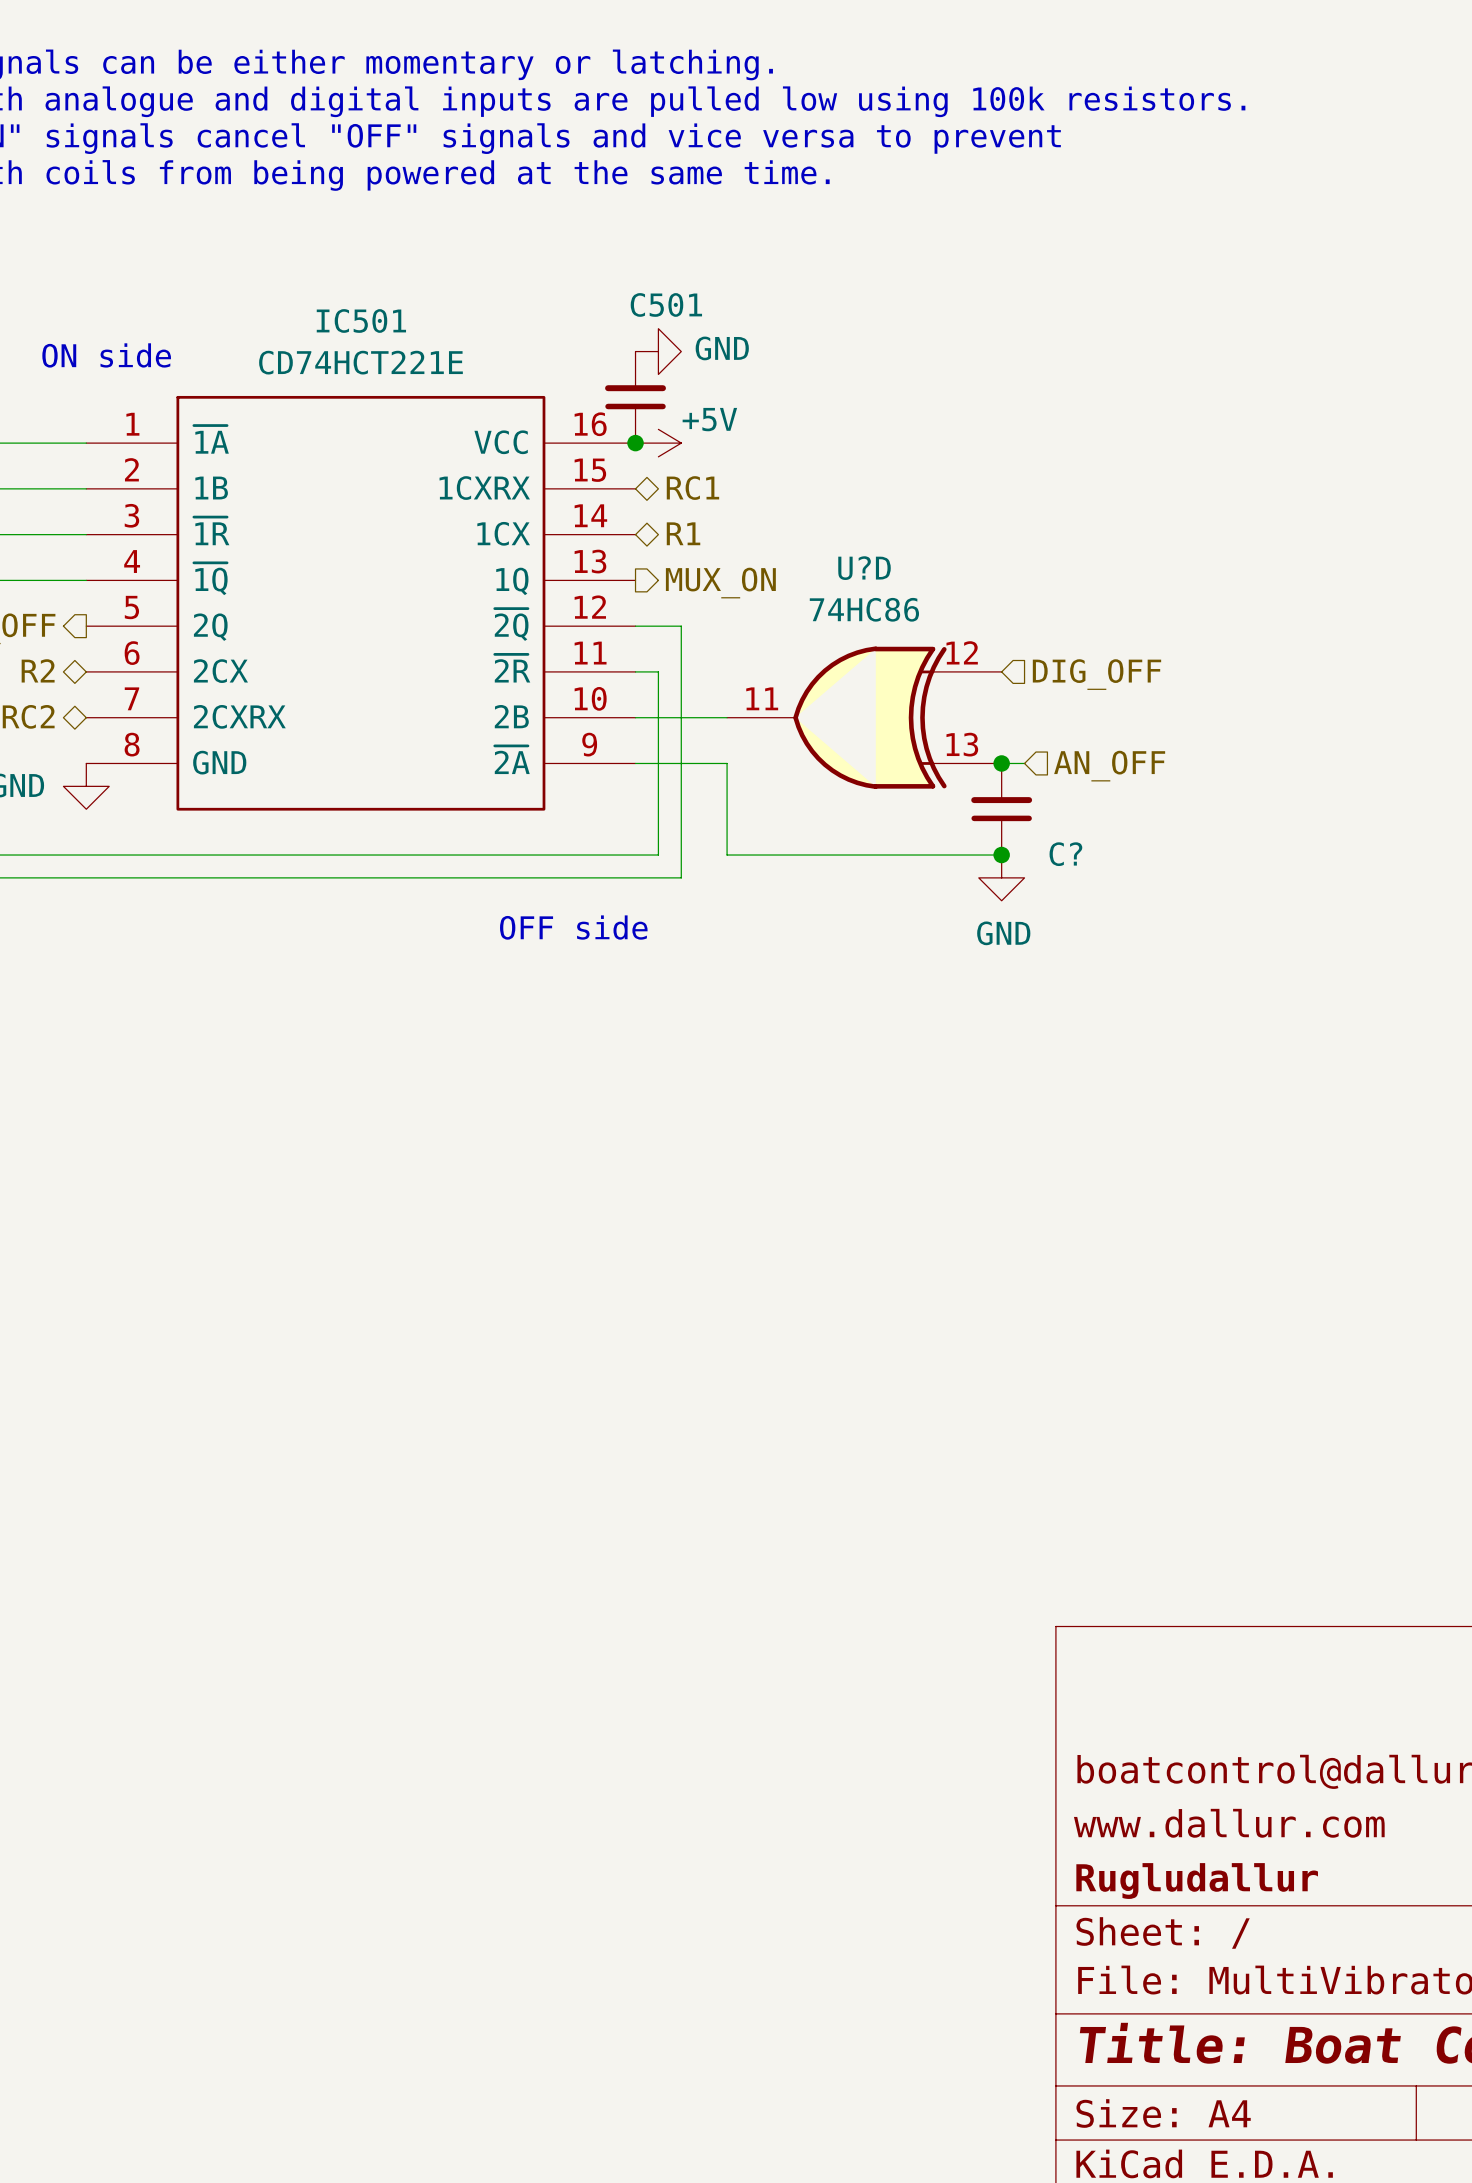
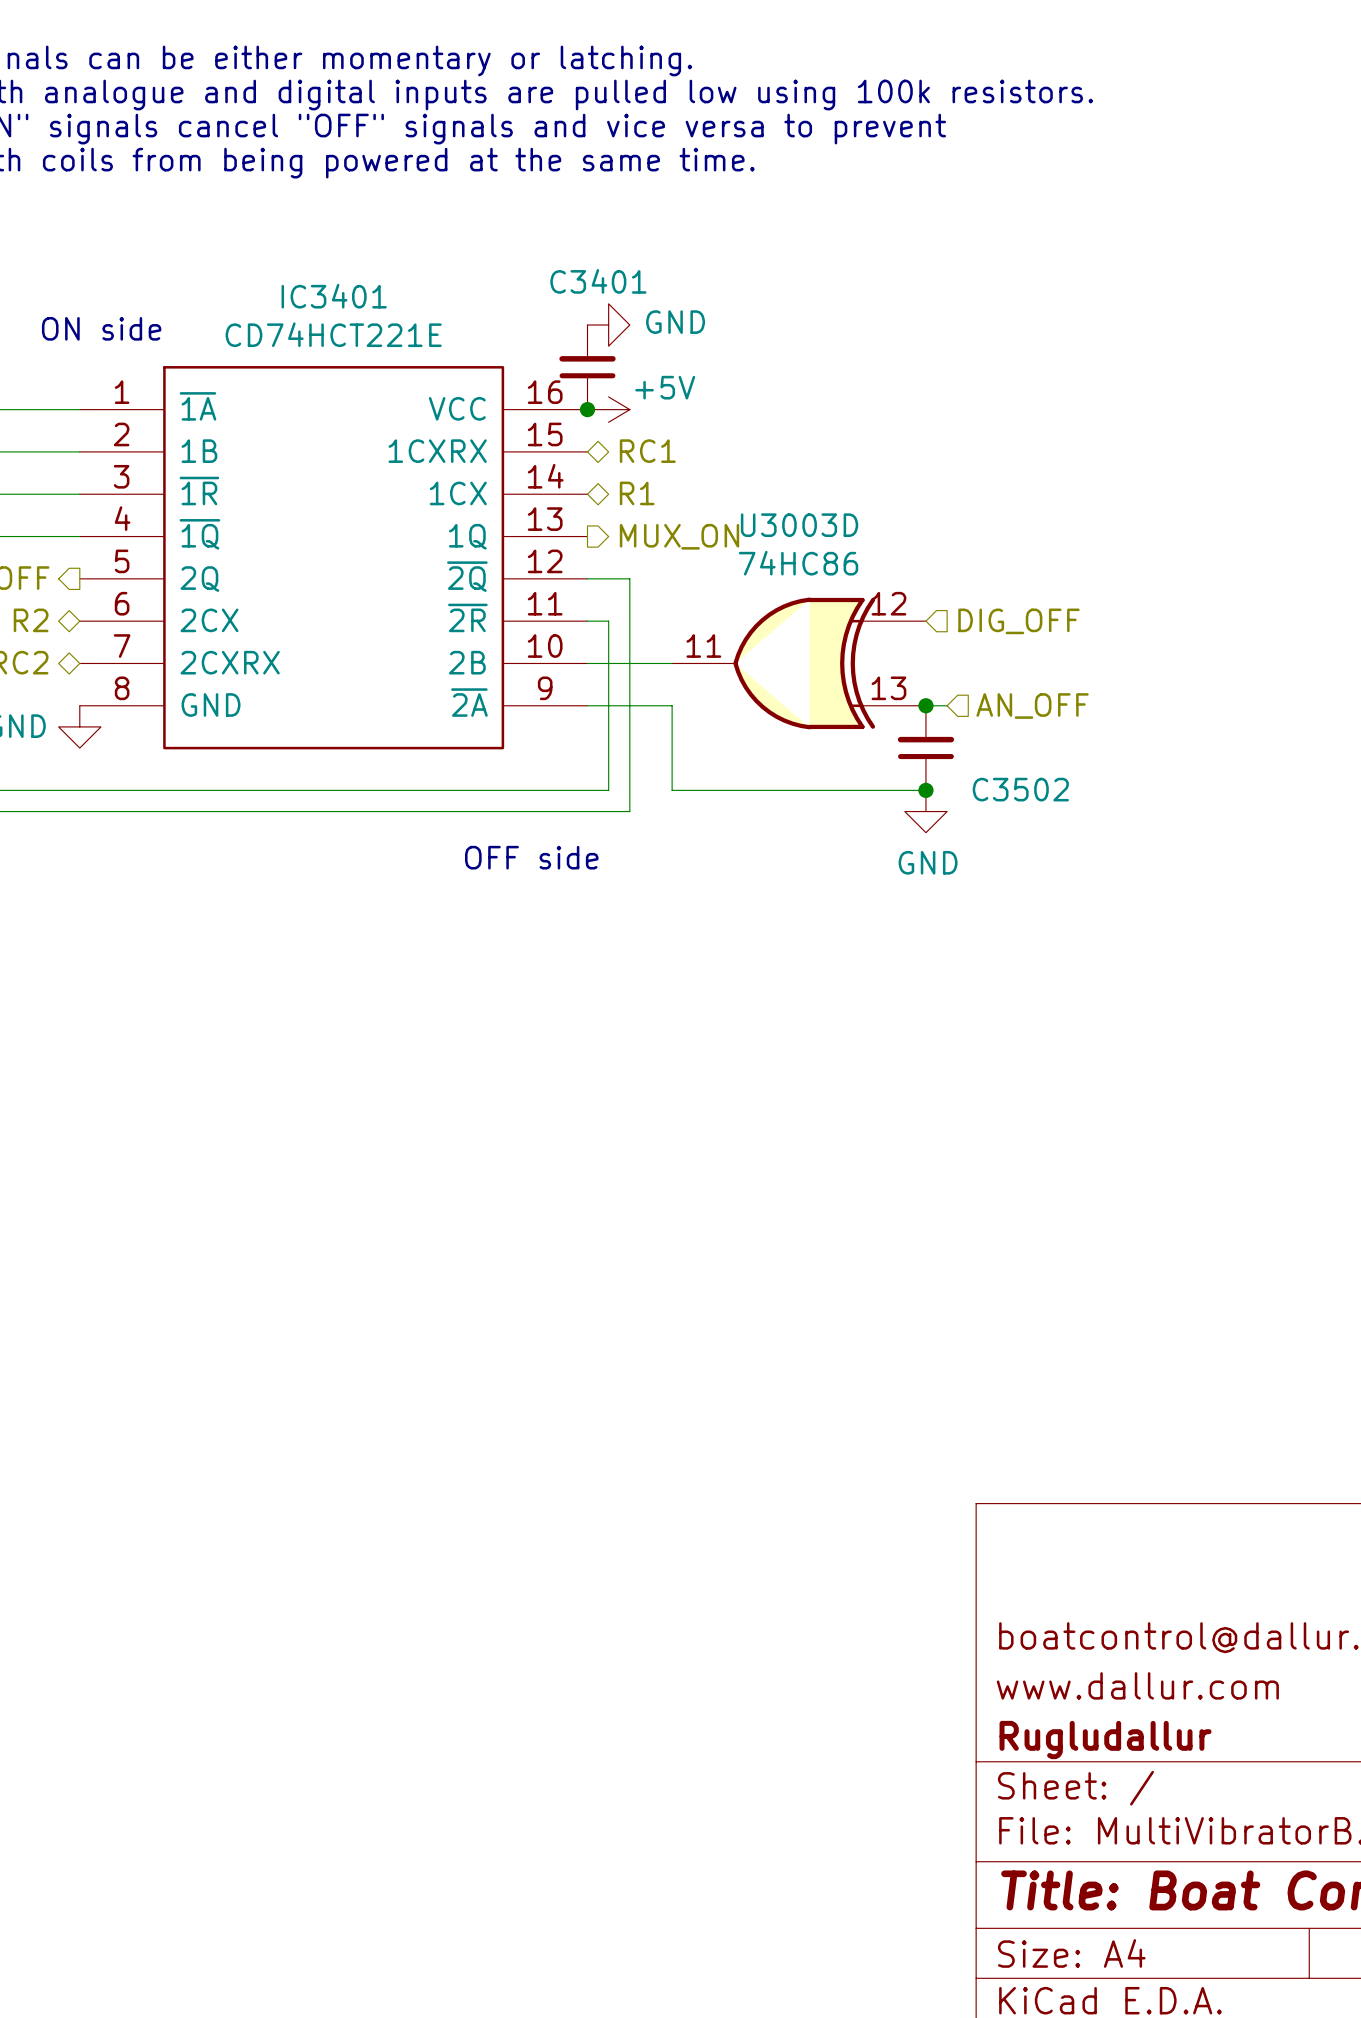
C501 name: C501 (666, 304) -> C3401 (598, 281)
IC501 name: IC501 (361, 320) -> IC3401 (334, 296)
U?D name: U?D (864, 568) -> U3003D (799, 525)
C? name: C? (1065, 854) -> C3502 (1020, 789)

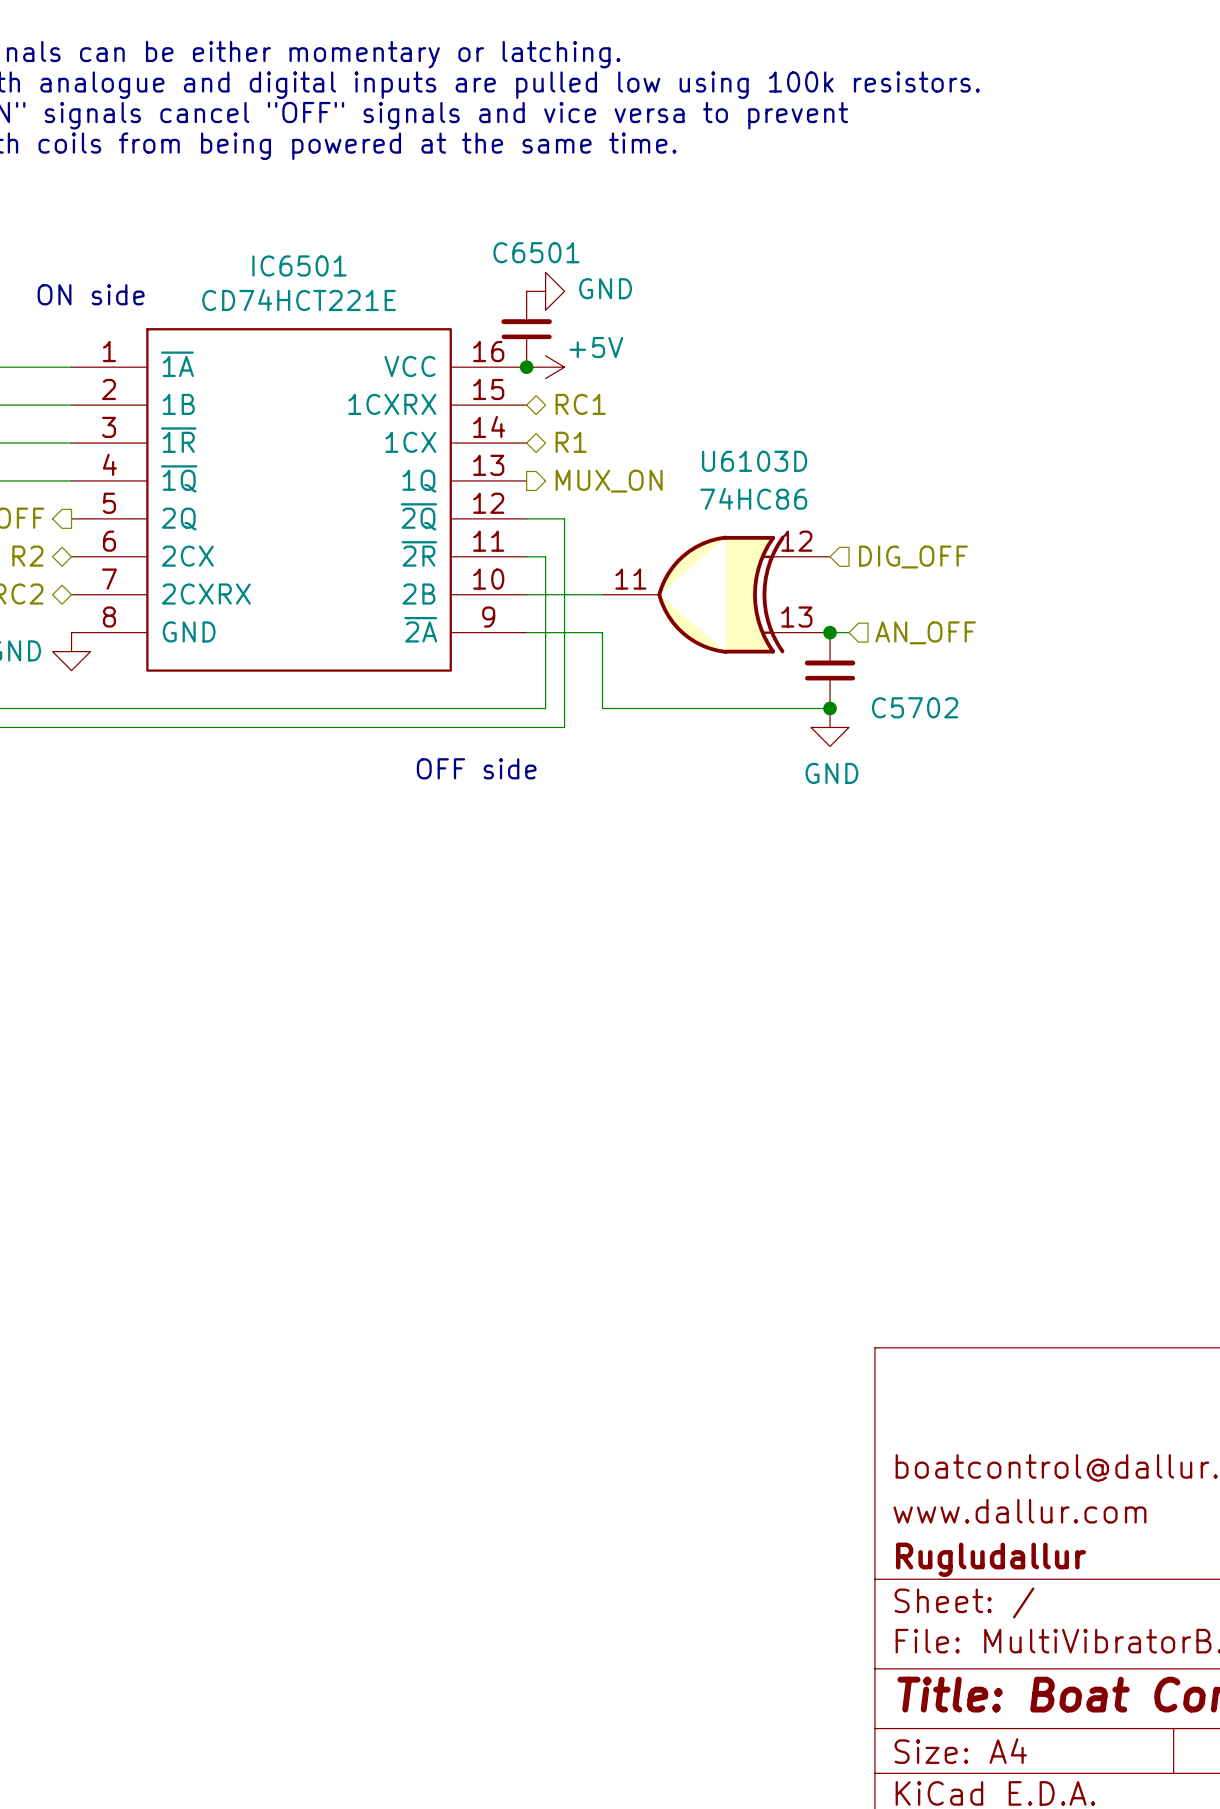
C3401 name: C3401 (598, 281) -> C6501 (536, 252)
IC3401 name: IC3401 (334, 296) -> IC6501 (299, 265)
U3003D name: U3003D (799, 525) -> U6103D (754, 461)
U3003D value position: 74HC86 (798, 563) -> 74HC86 (753, 498)
C3502 name: C3502 (1020, 789) -> C5702 (915, 707)

